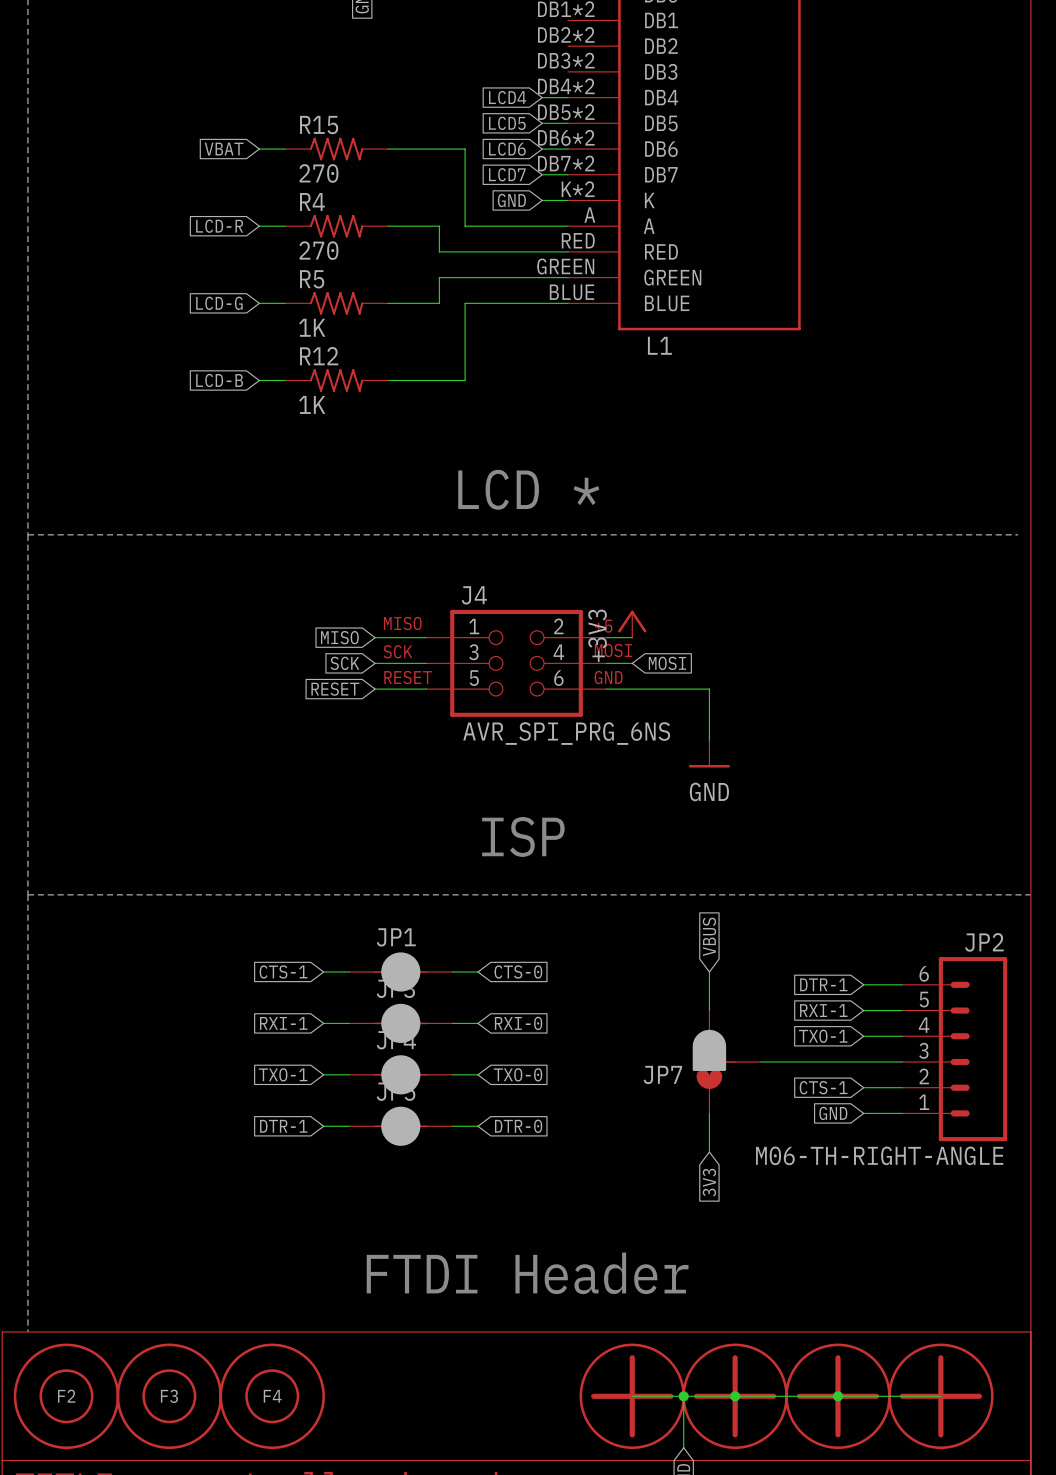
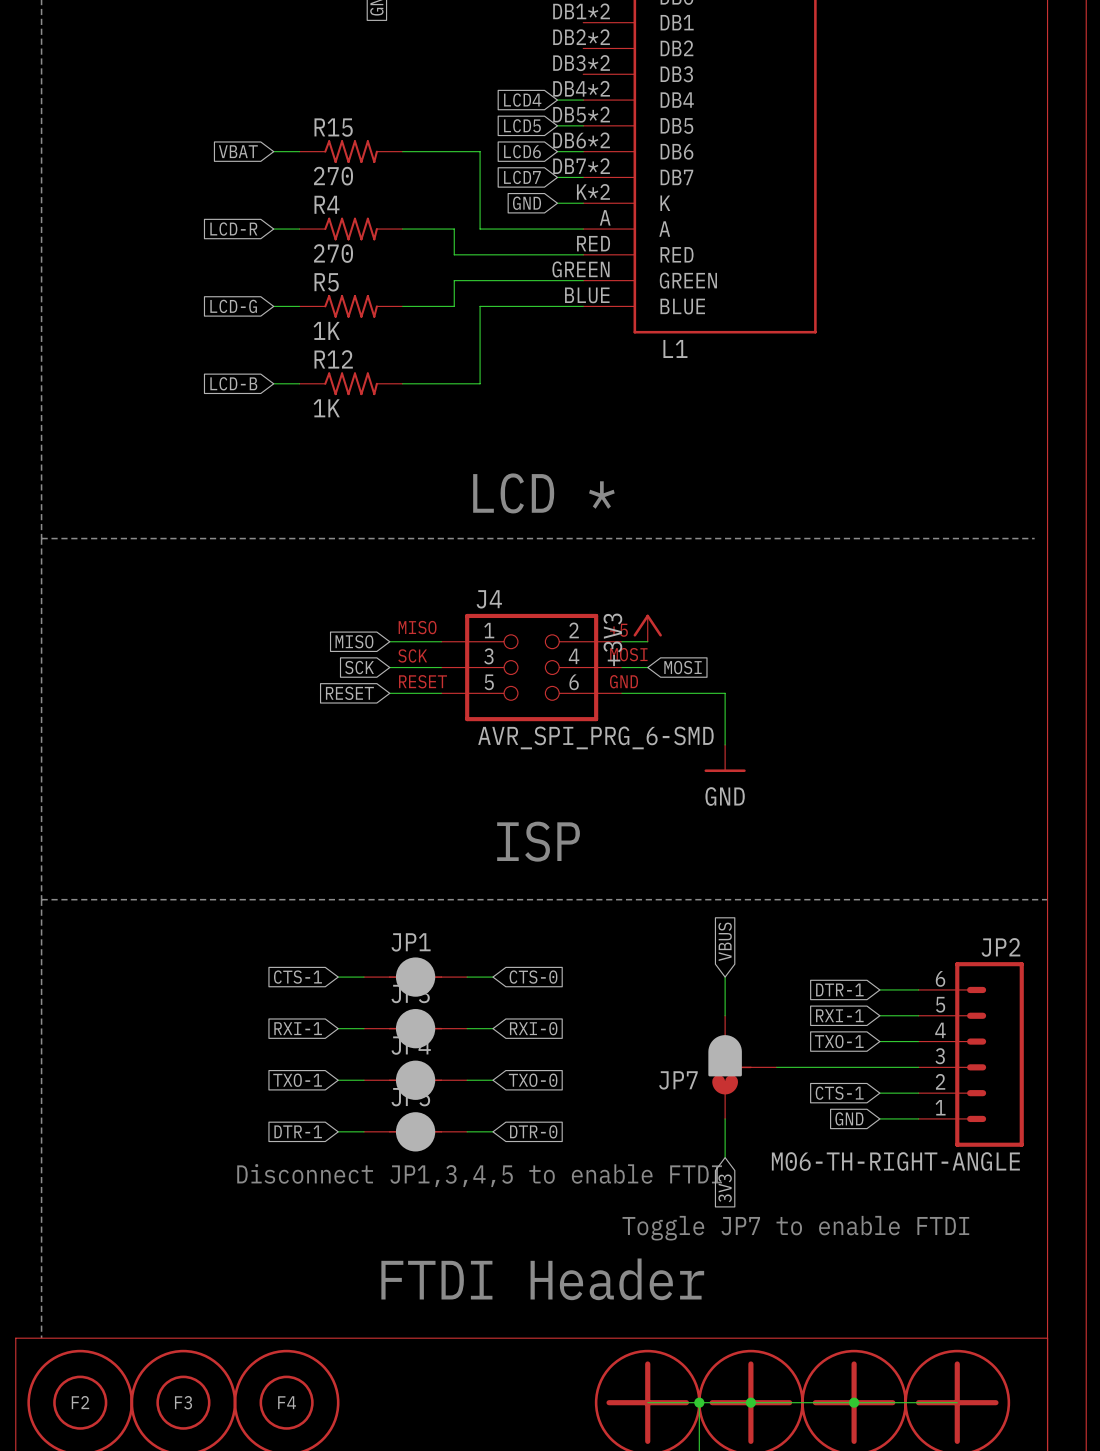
J4 value: AVR_SPI_PRG_6NS (566, 733) -> AVR_SPI_PRG_6-SMD (595, 737)
text: none -> Disconnect JP1,3,4,5 to enable FTDI (479, 1175)
text: none -> Toggle JP7 to enable FTDI (795, 1228)

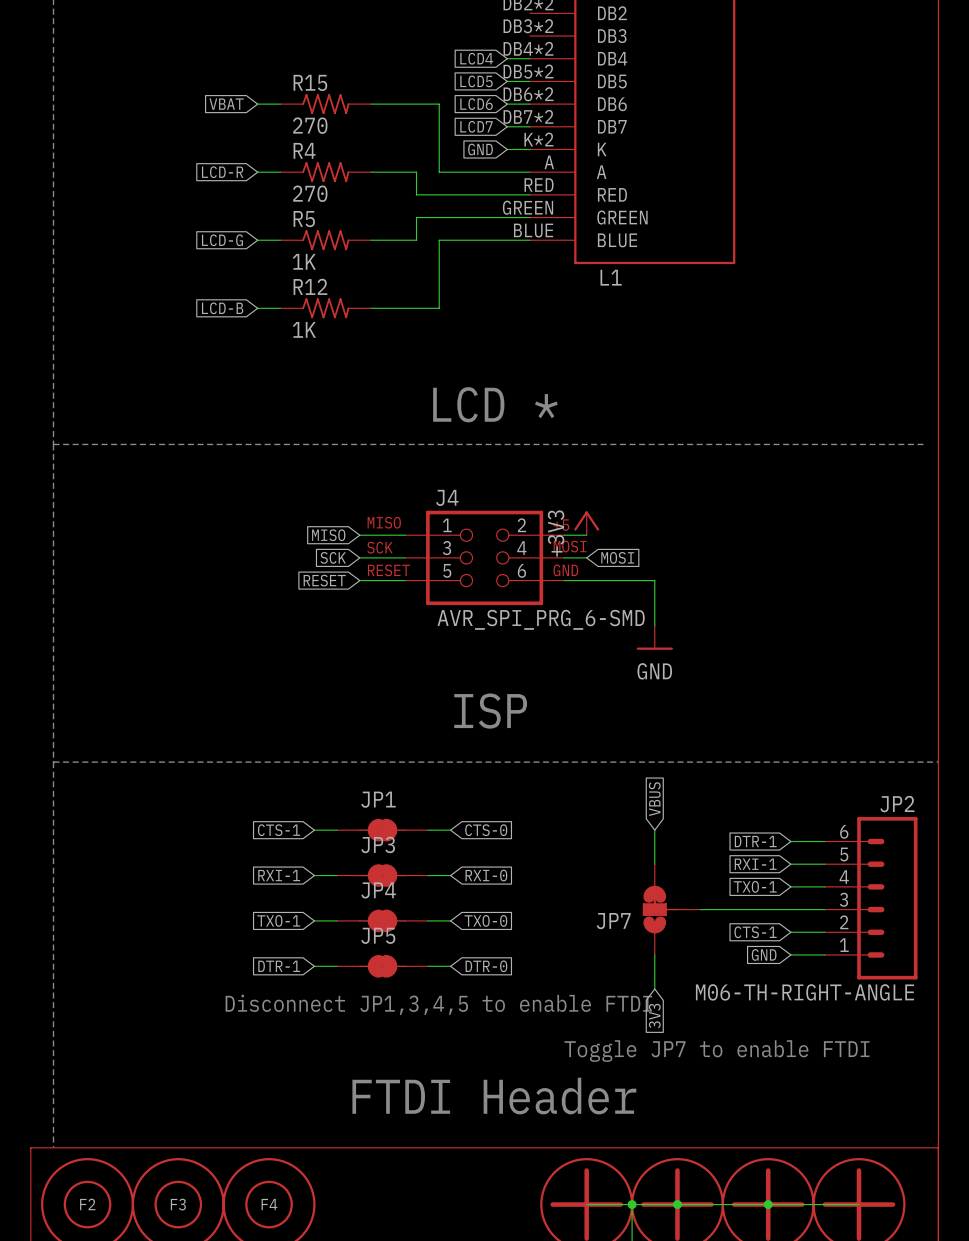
JP1 symbol: [363, 957, 468, 997] -> [337, 818, 428, 842]
JP3 symbol: [363, 1009, 468, 1049] -> [337, 864, 428, 887]
JP7 symbol: [708, 1015, 777, 1119] -> [642, 864, 701, 955]
JP4 symbol: [363, 1060, 468, 1100] -> [337, 909, 428, 933]
JP5 symbol: [363, 1112, 468, 1152] -> [337, 954, 428, 978]

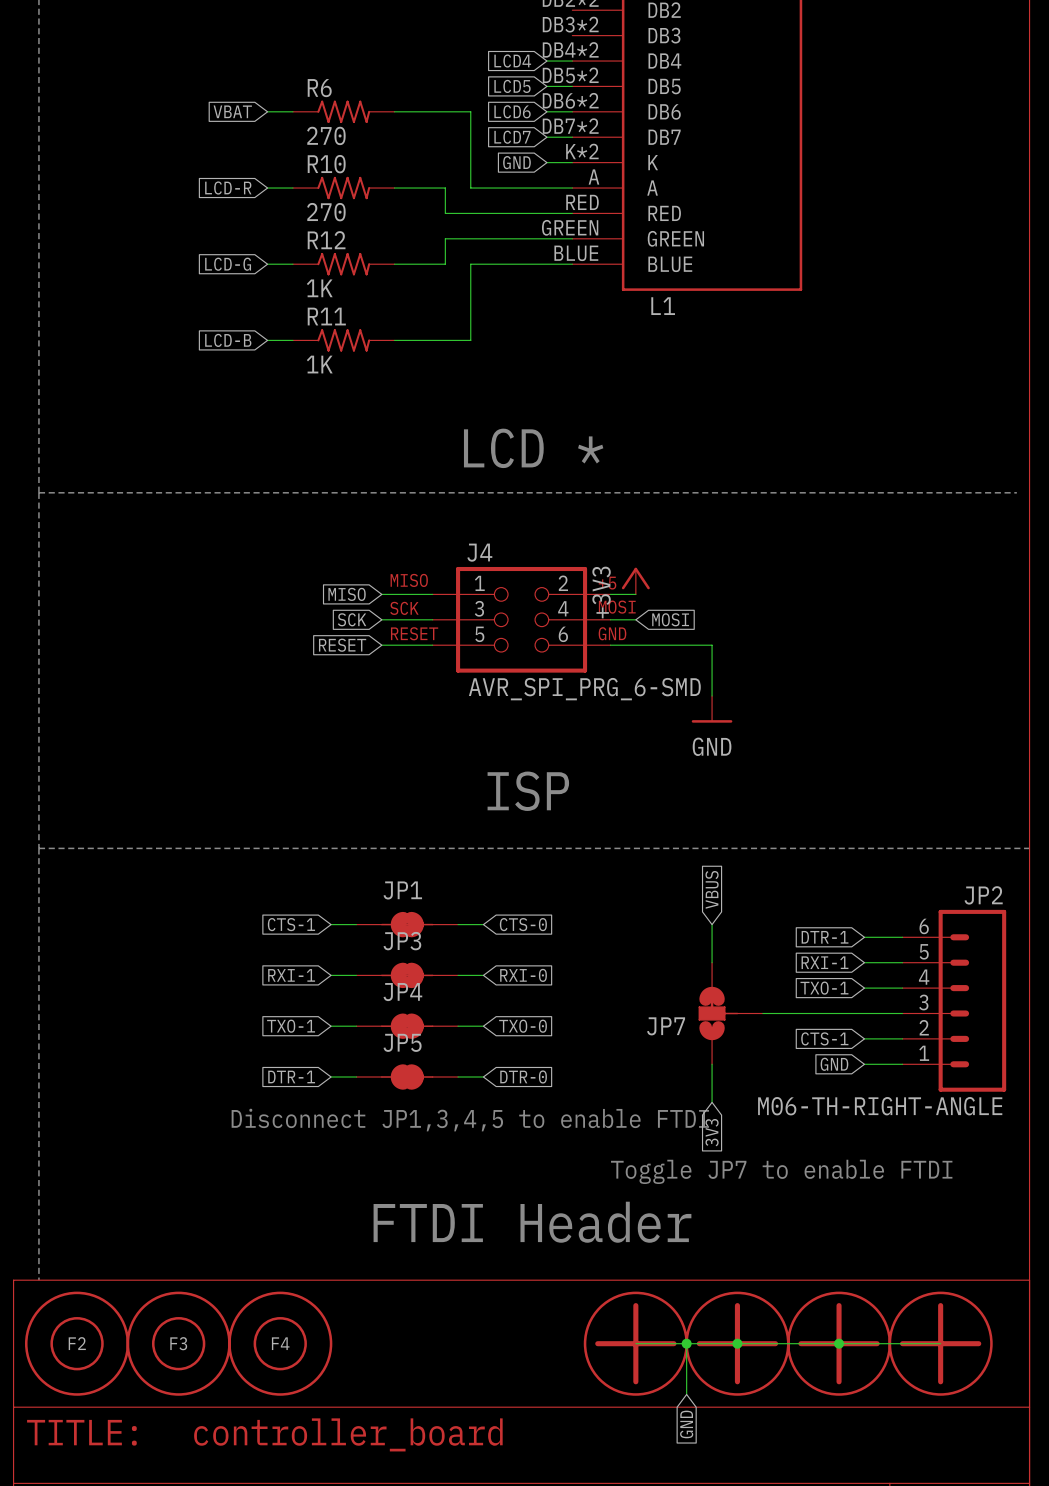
R15 name: R15 (310, 82) -> R6 (319, 88)
R4 name: R4 (304, 150) -> R10 (326, 164)
R5 name: R5 (304, 219) -> R12 (326, 240)
R12 name: R12 (310, 286) -> R11 (326, 316)

